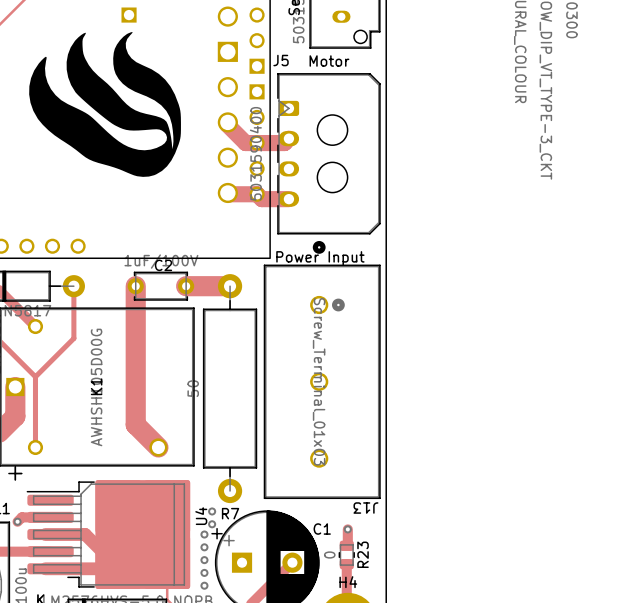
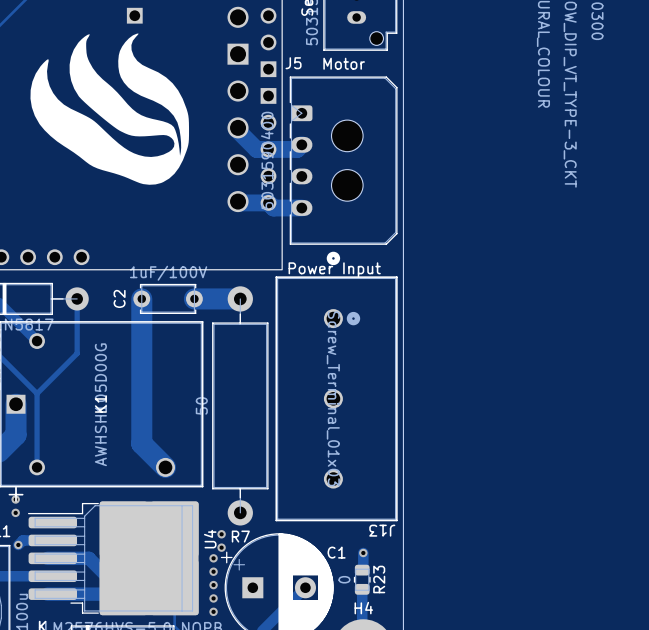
C2 name rotation: 0° (163, 265) -> 90° counterclockwise (119, 298)
C2 name position: C2 (163, 265) -> C2 (119, 298)
via: none -> (15, 499)
via: none -> (15, 512)

